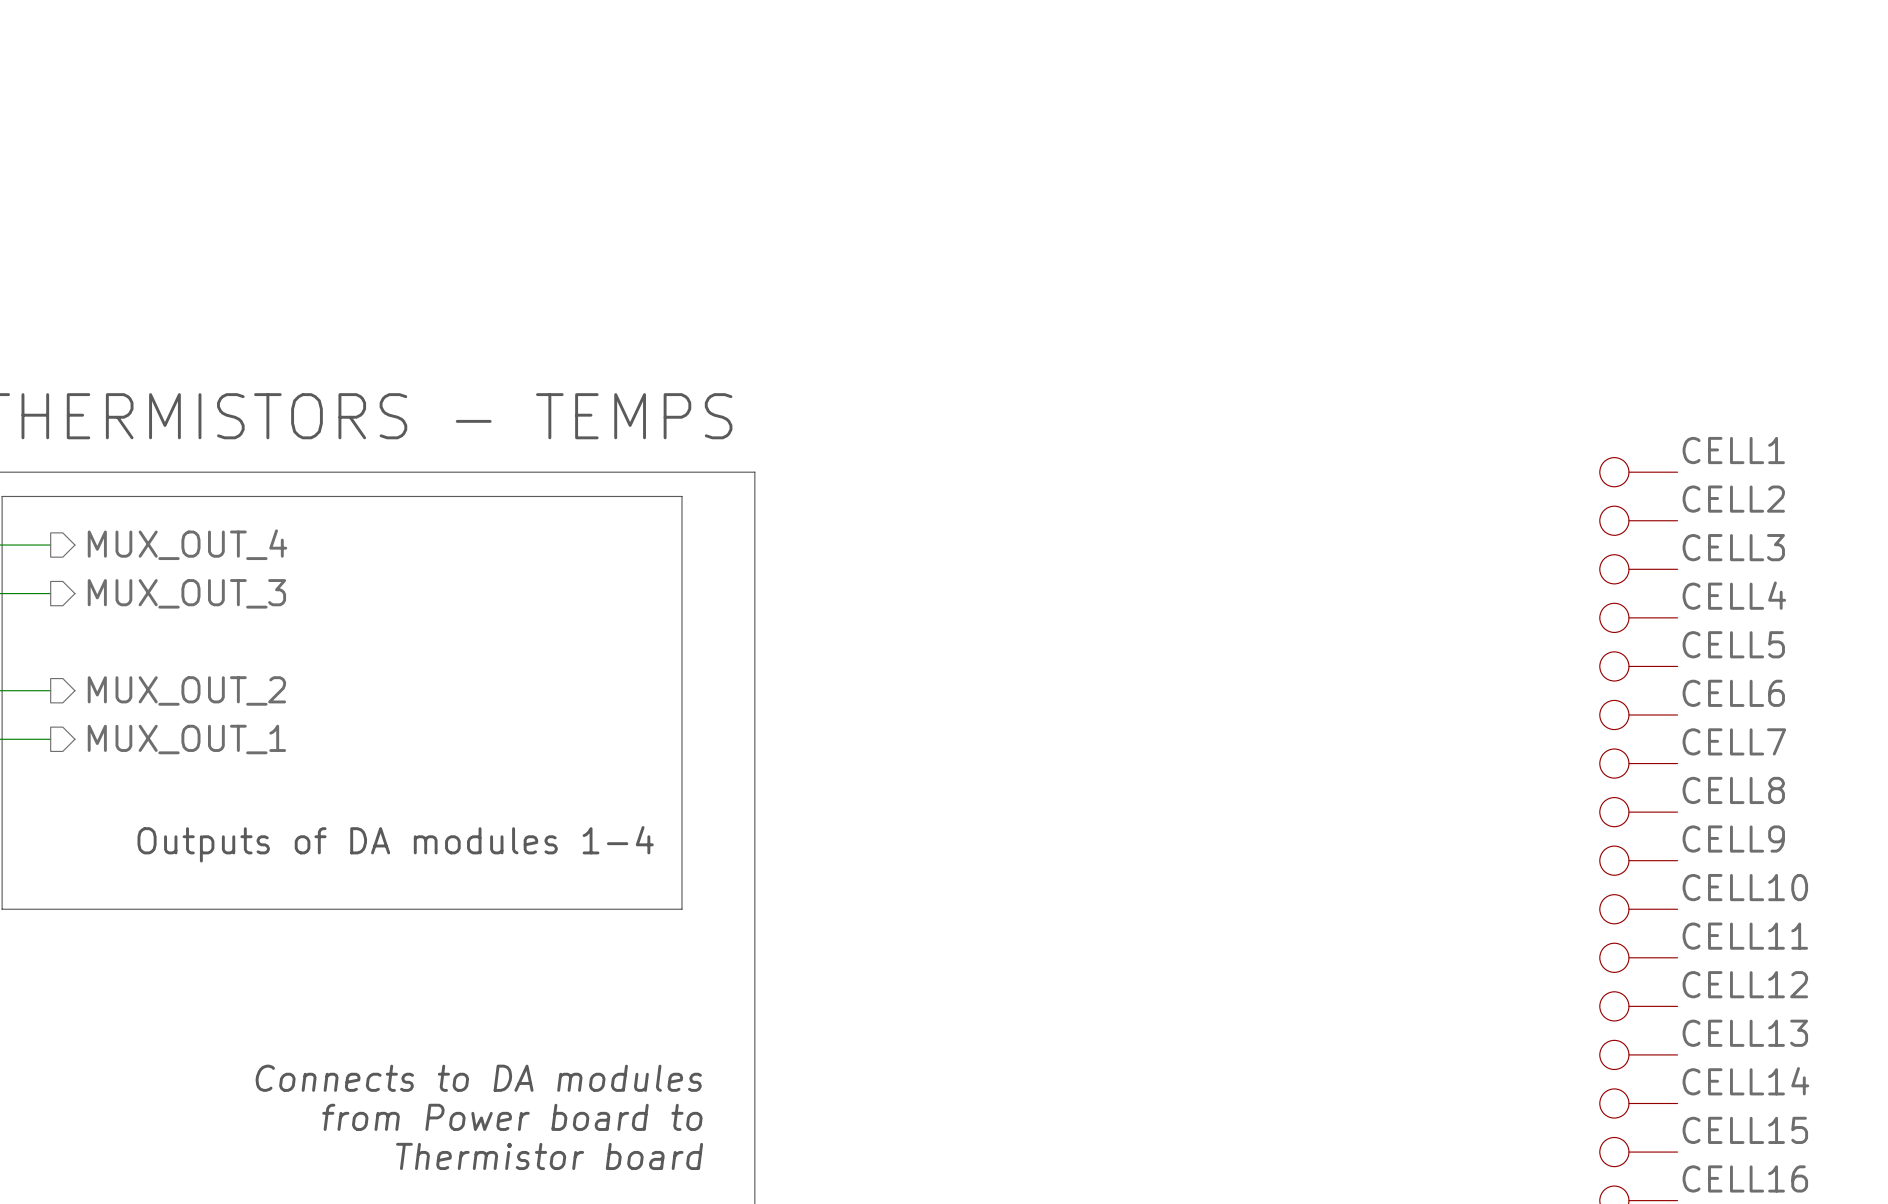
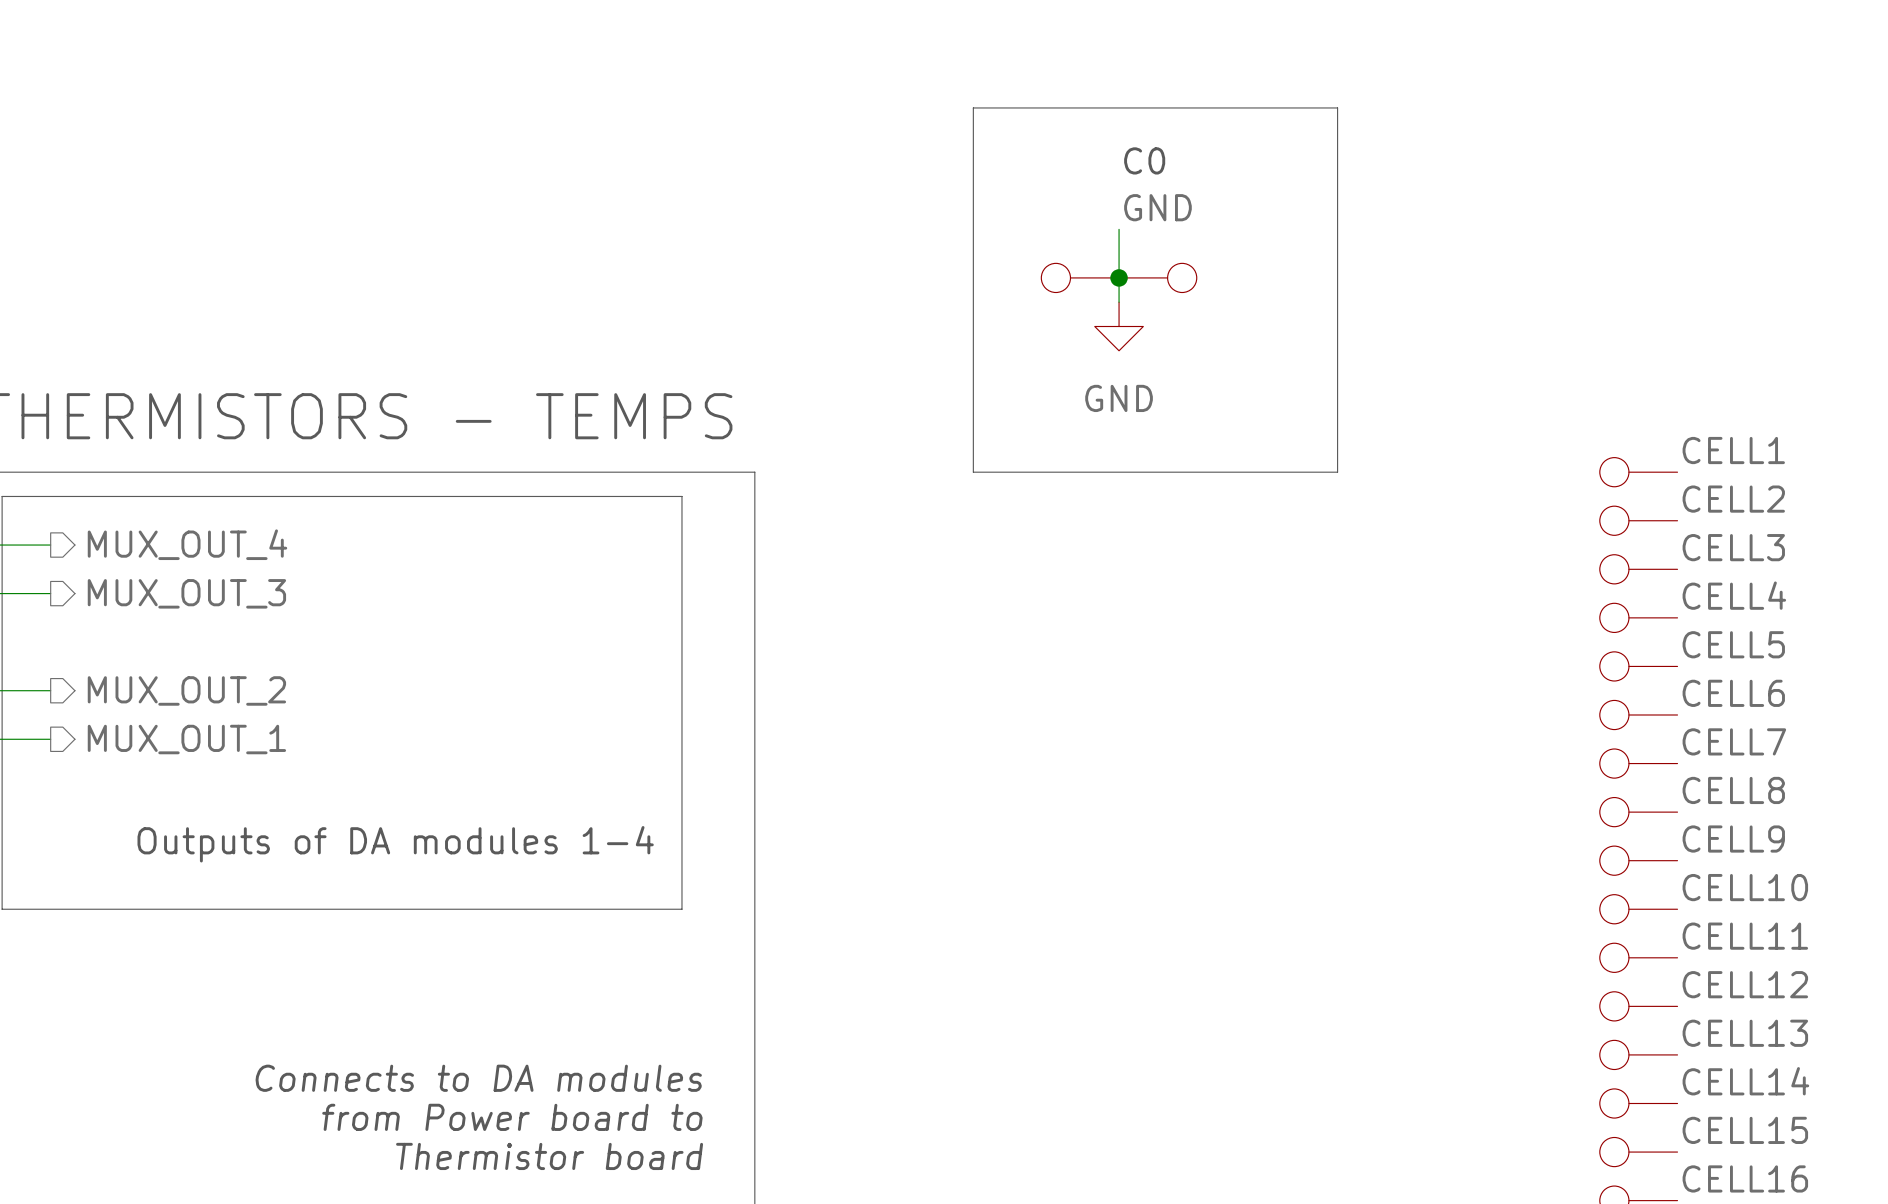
line: none -> (973, 107) (973, 472) (1337, 472) (1337, 107) (973, 107)
text: none -> C0 (1144, 160)
label: none -> GND (1157, 207)
wire: none -> (1119, 229) (1119, 302)
part: none -> (1080, 277)
junction: none -> (1119, 277)
part: none -> (1157, 277)
power symbol: none -> GND (1119, 326)

